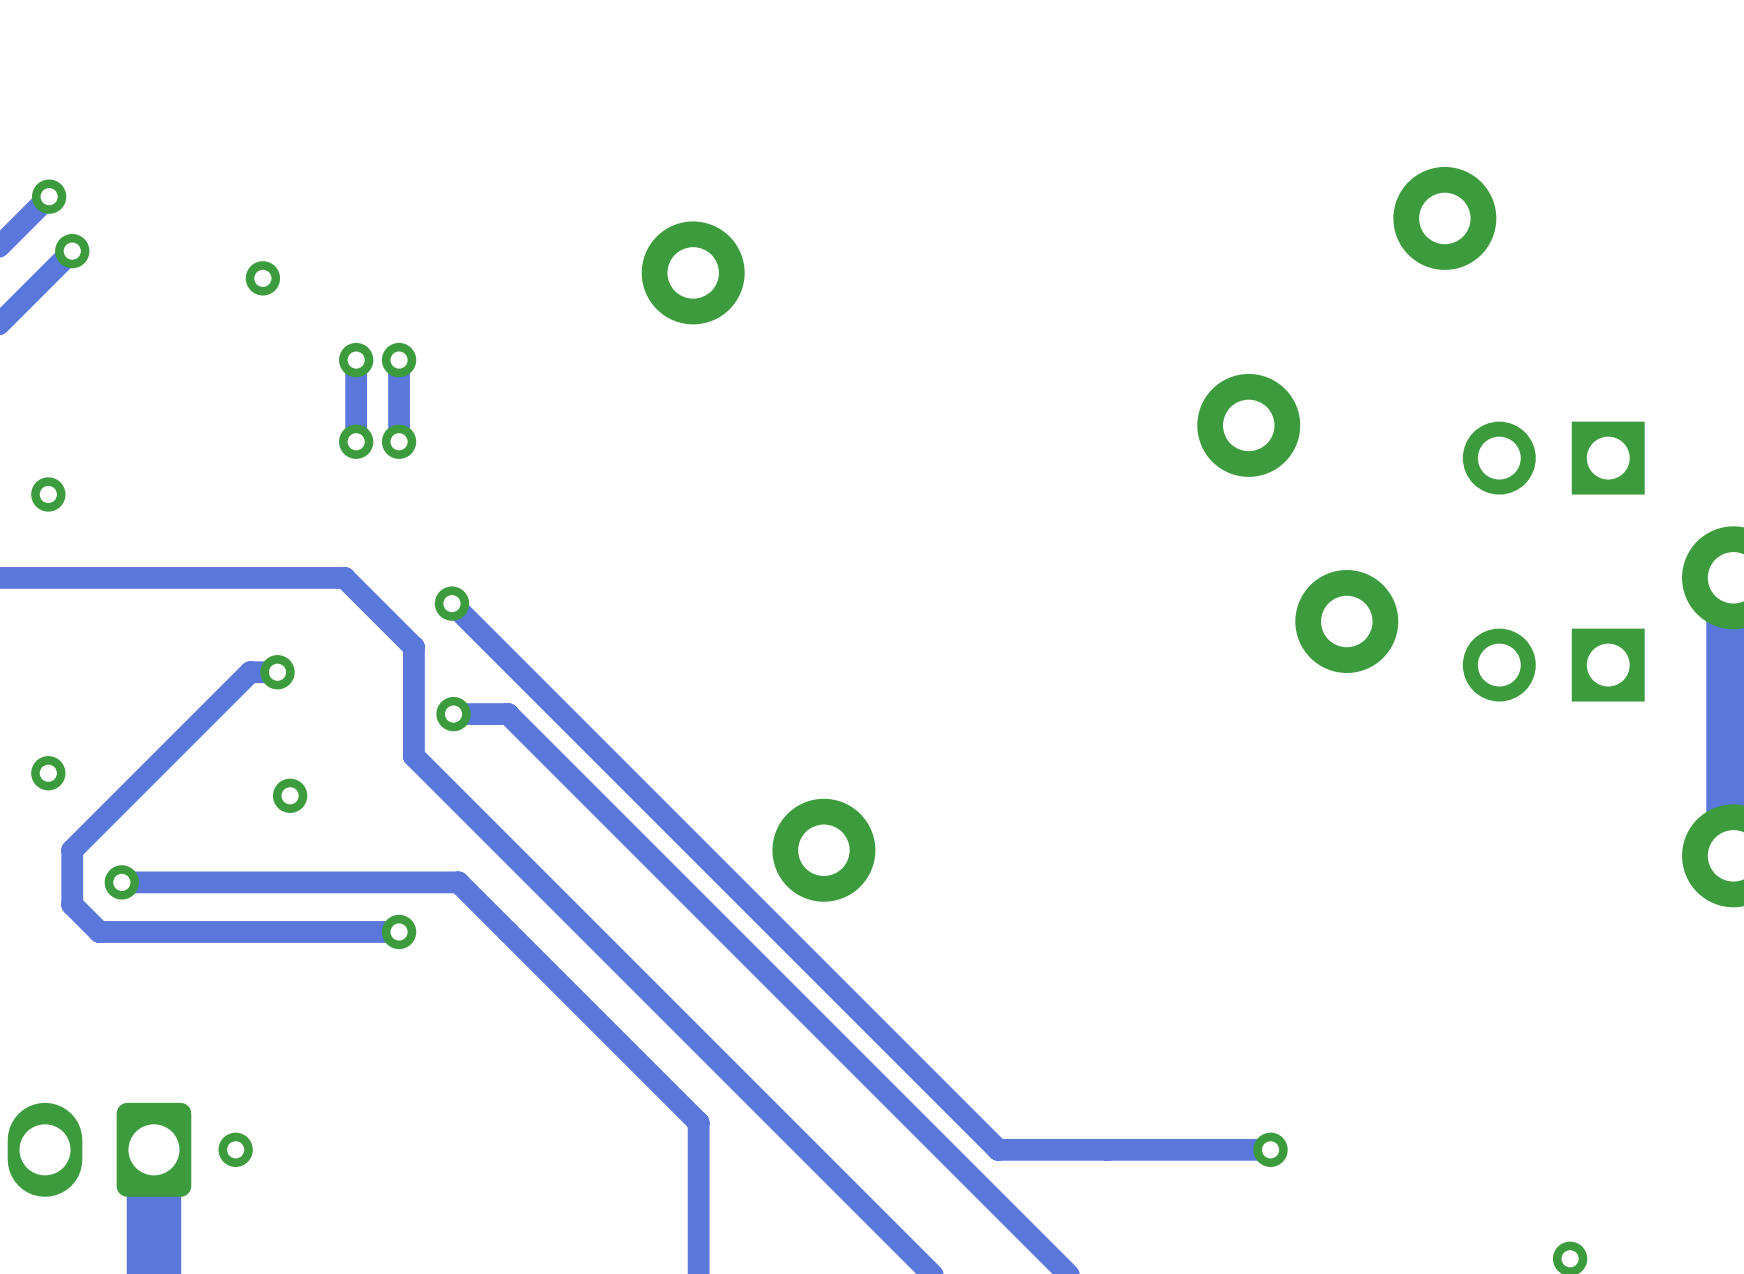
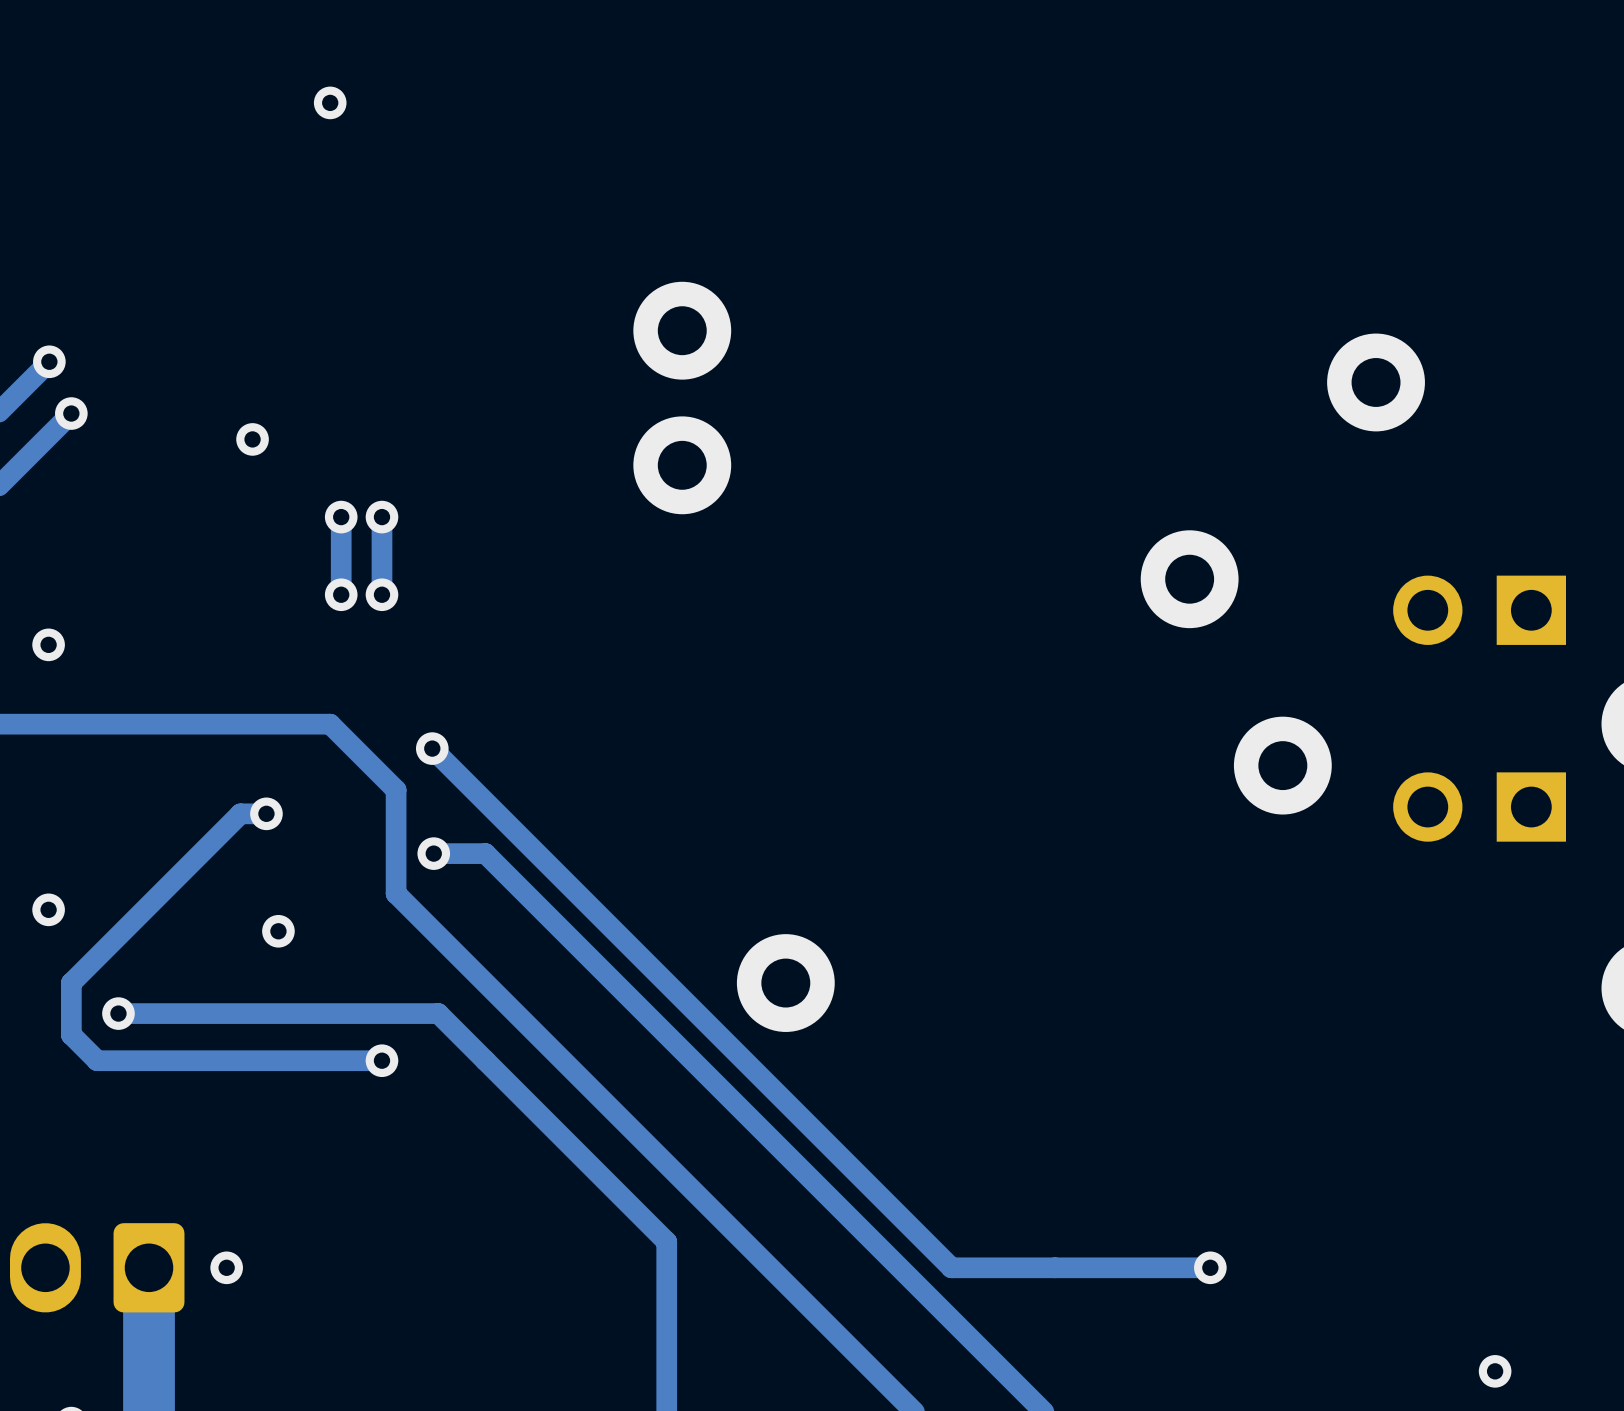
via: none -> (682, 330)
via position: (693, 272) -> (682, 465)

